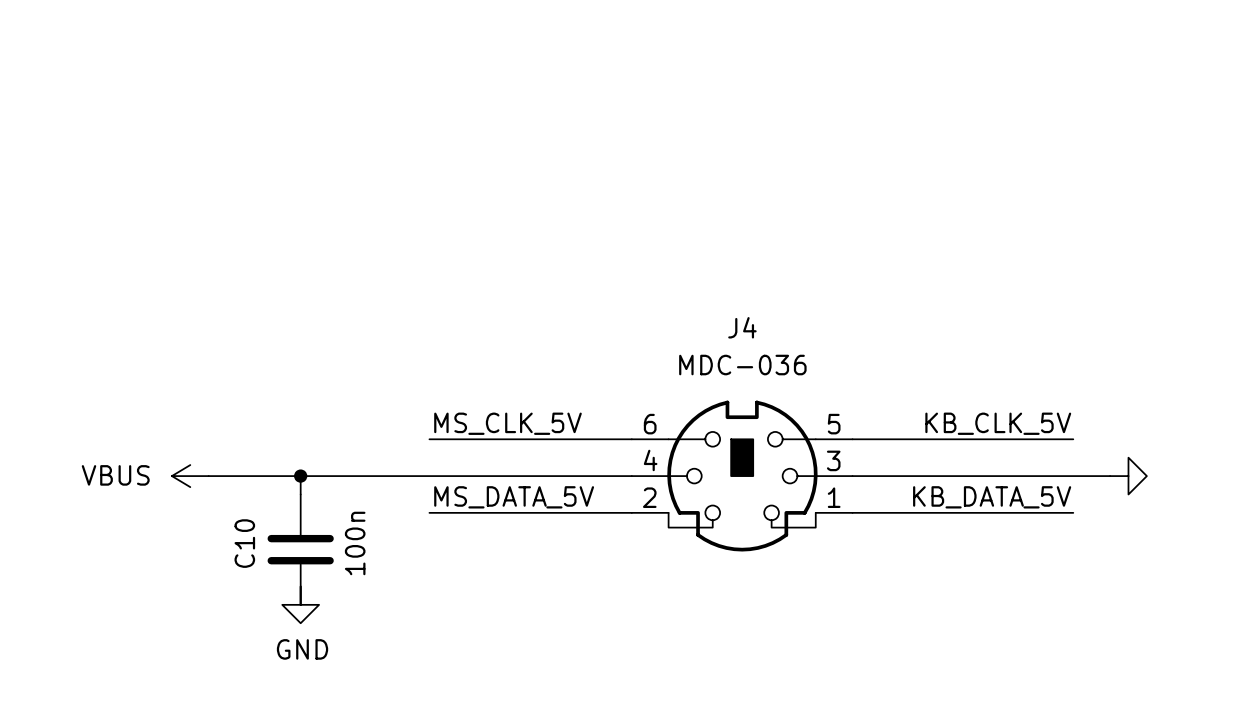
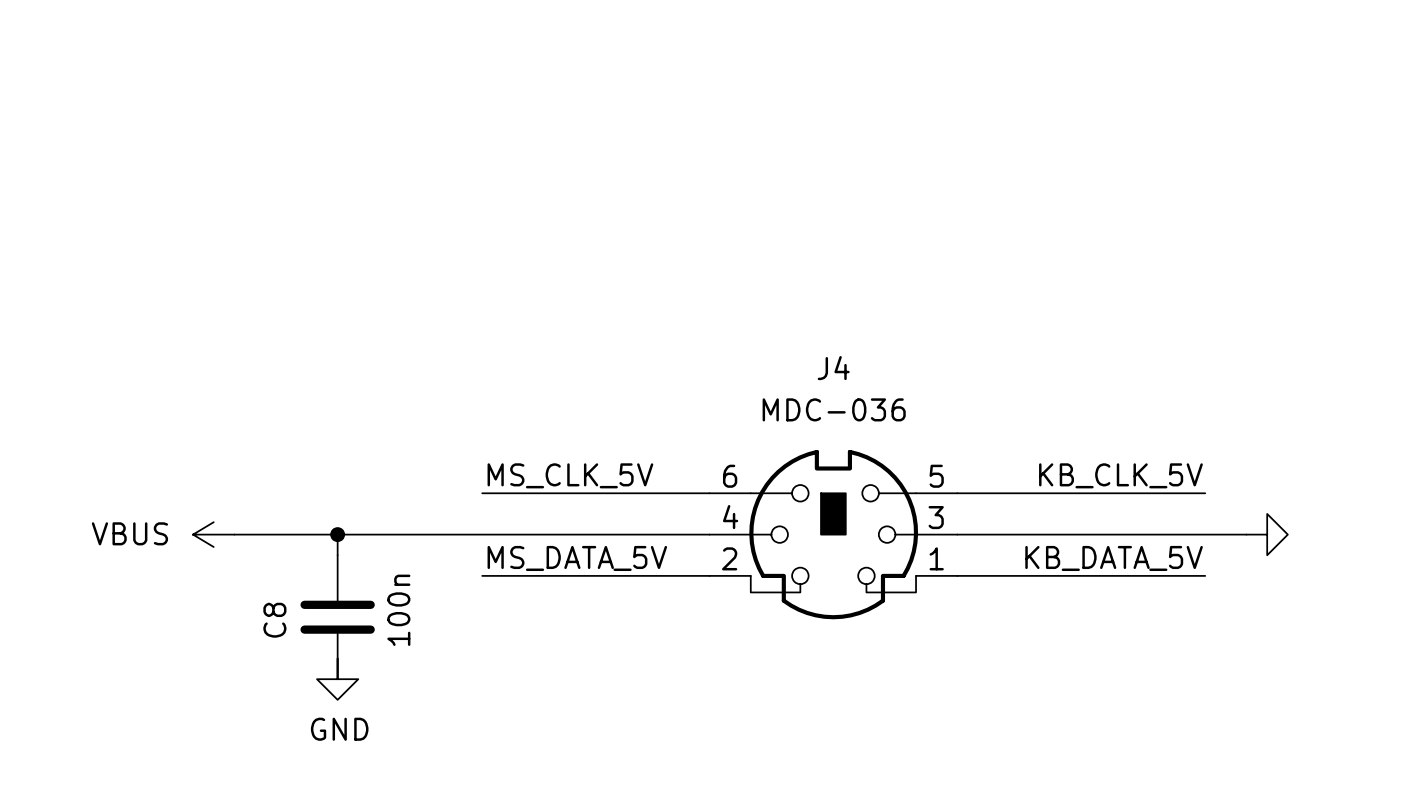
C10 name: C10 (244, 543) -> C8 (274, 620)

